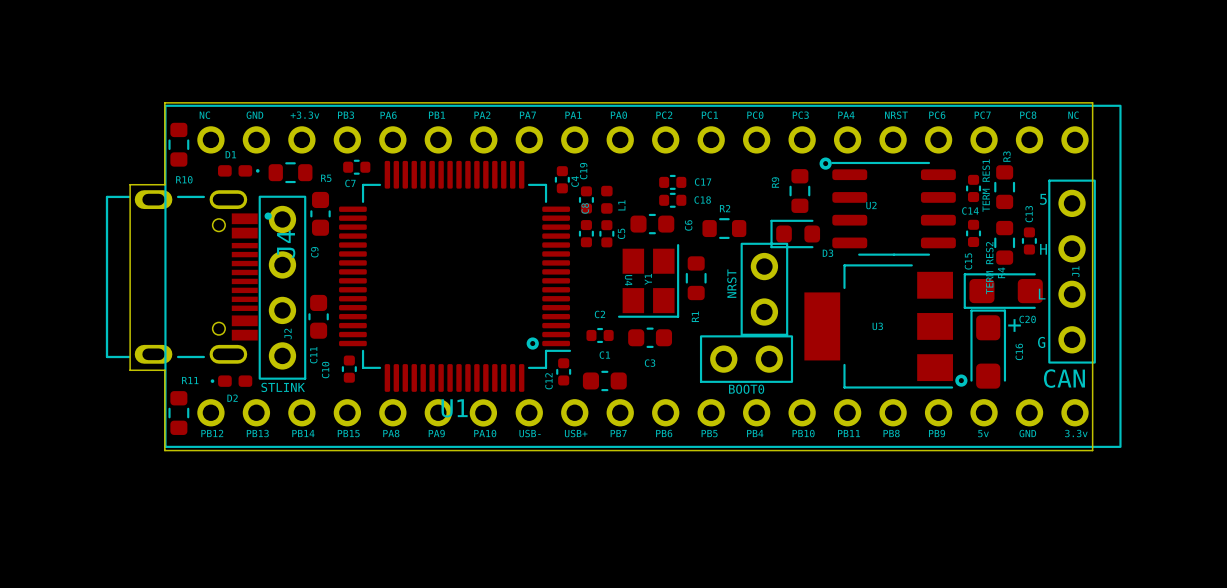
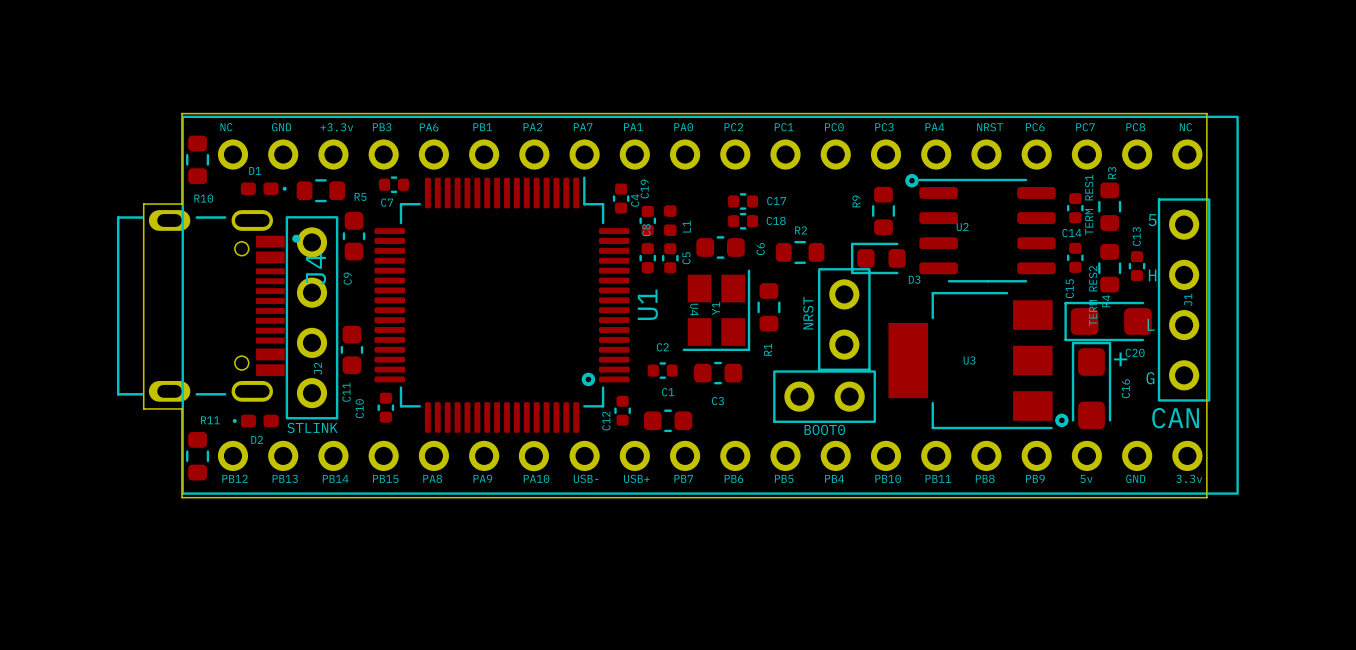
U1 rotation: 0° (455, 276) -> 90° counterclockwise (502, 304)

